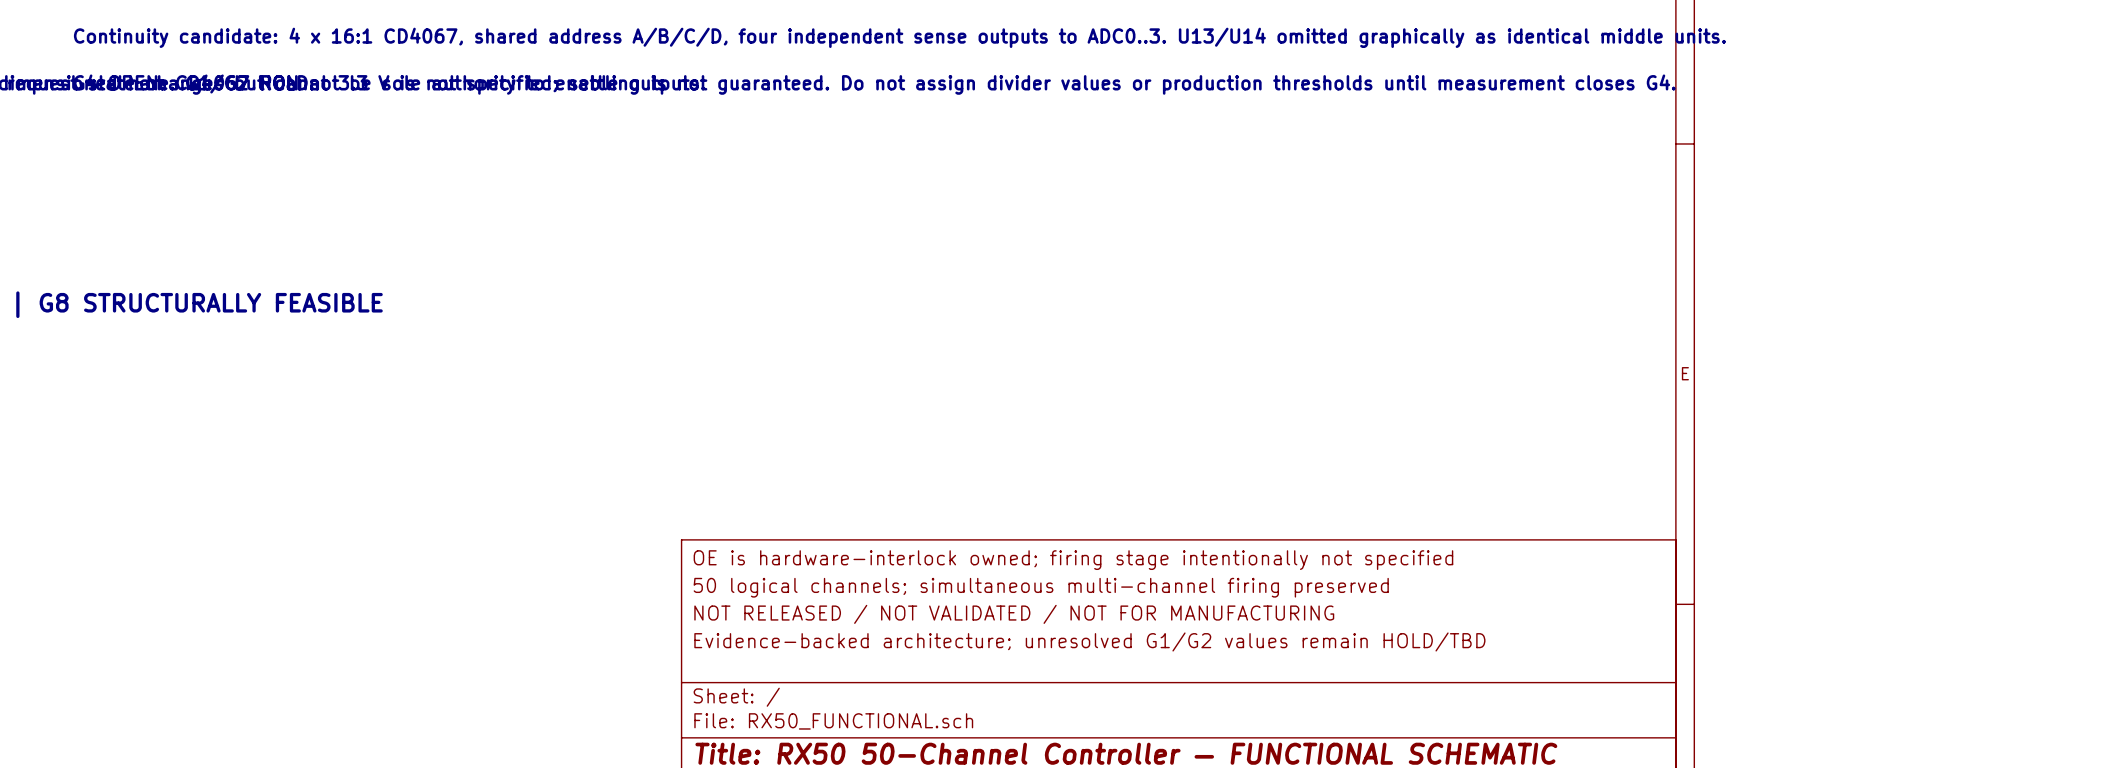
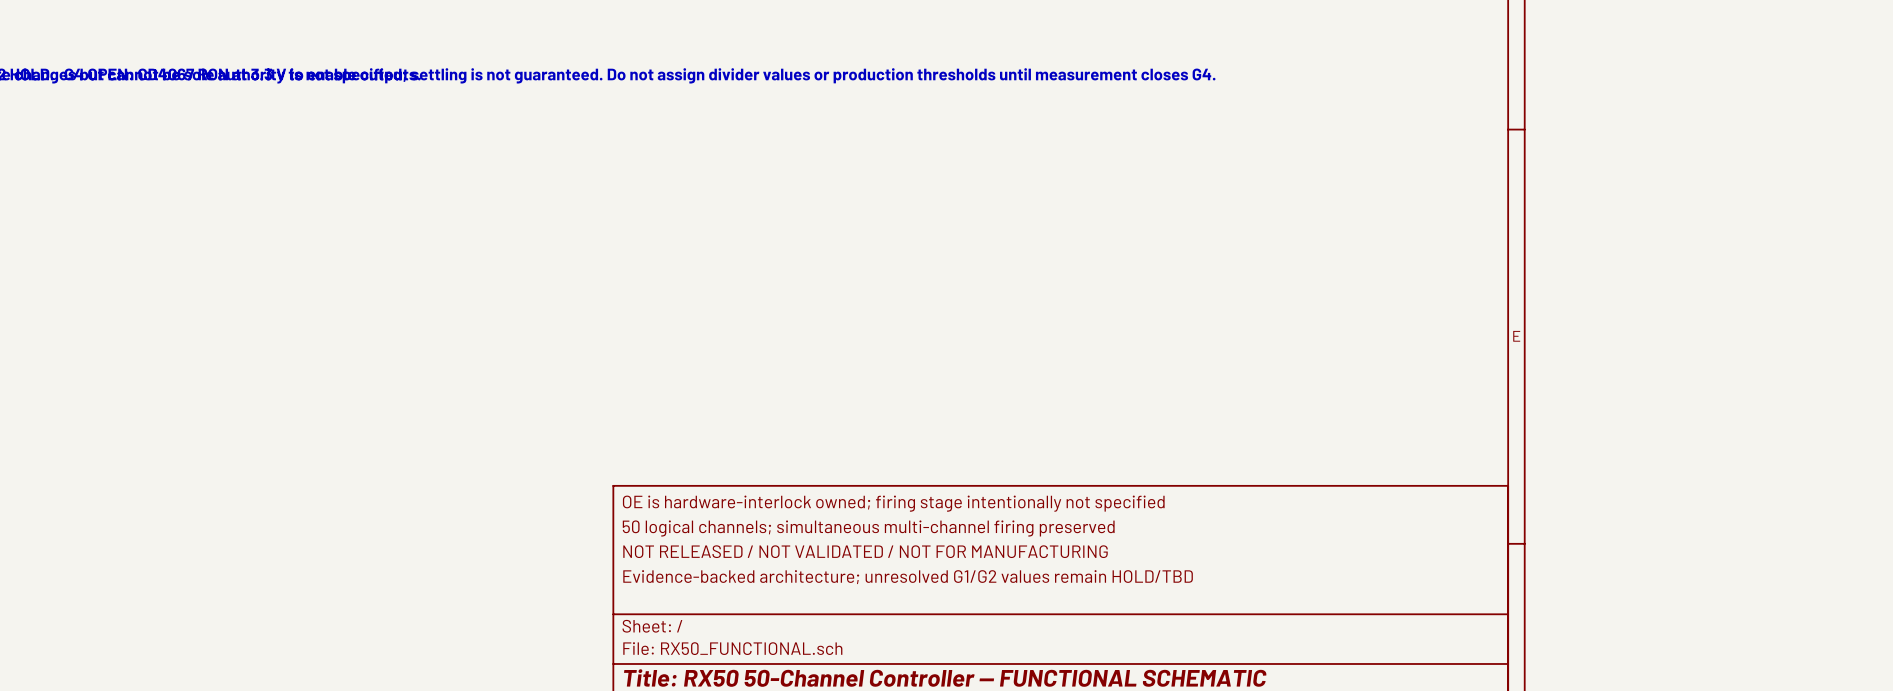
text: Continuity candidate: 4 x 16:1 CD4067, shared address A/B/C/D, four independent sense outputs to ADC0..3. U13/U14 omitted graphically as identical middle units. (899, 37) -> none

